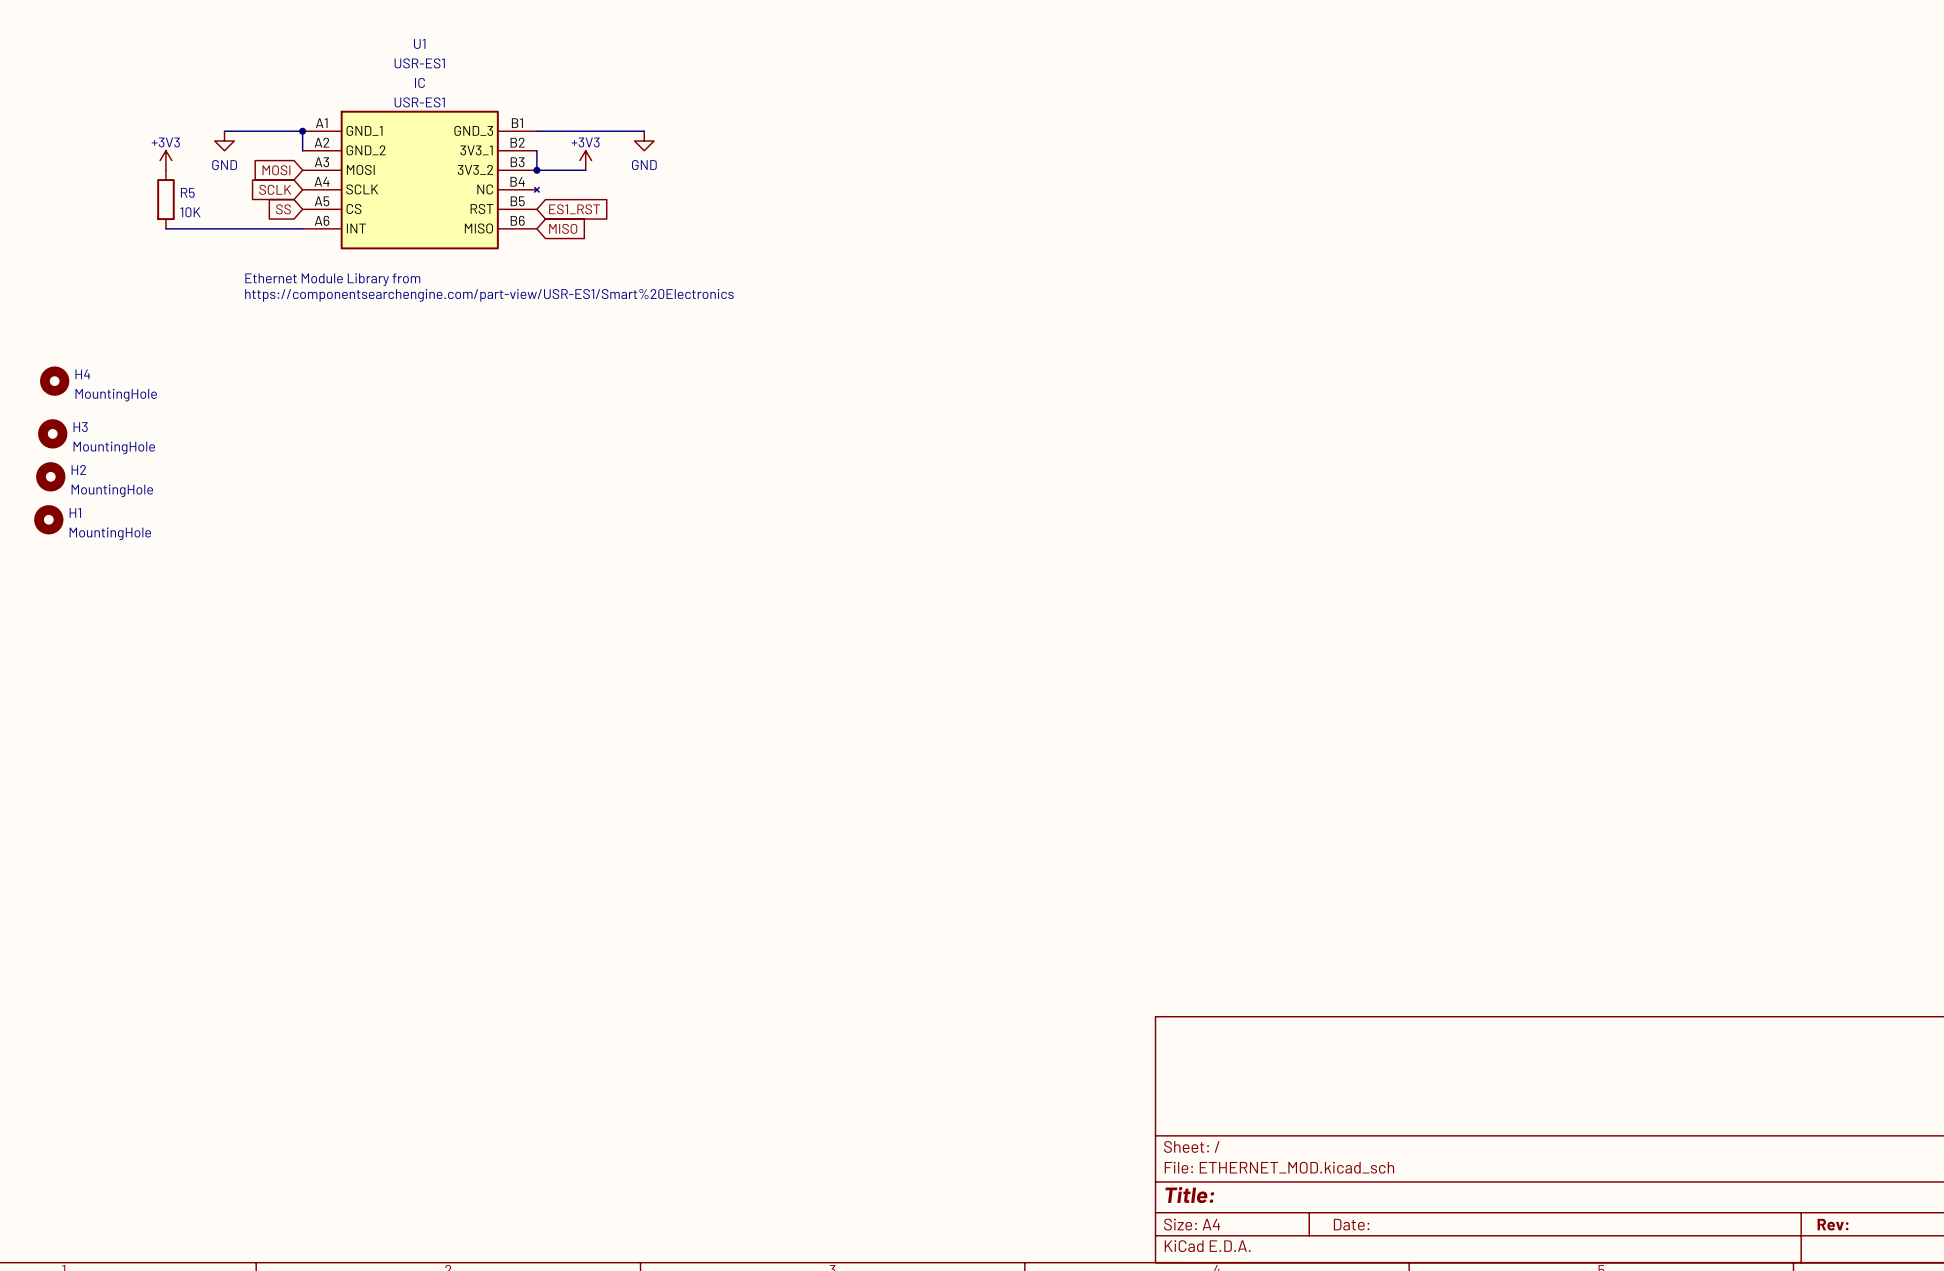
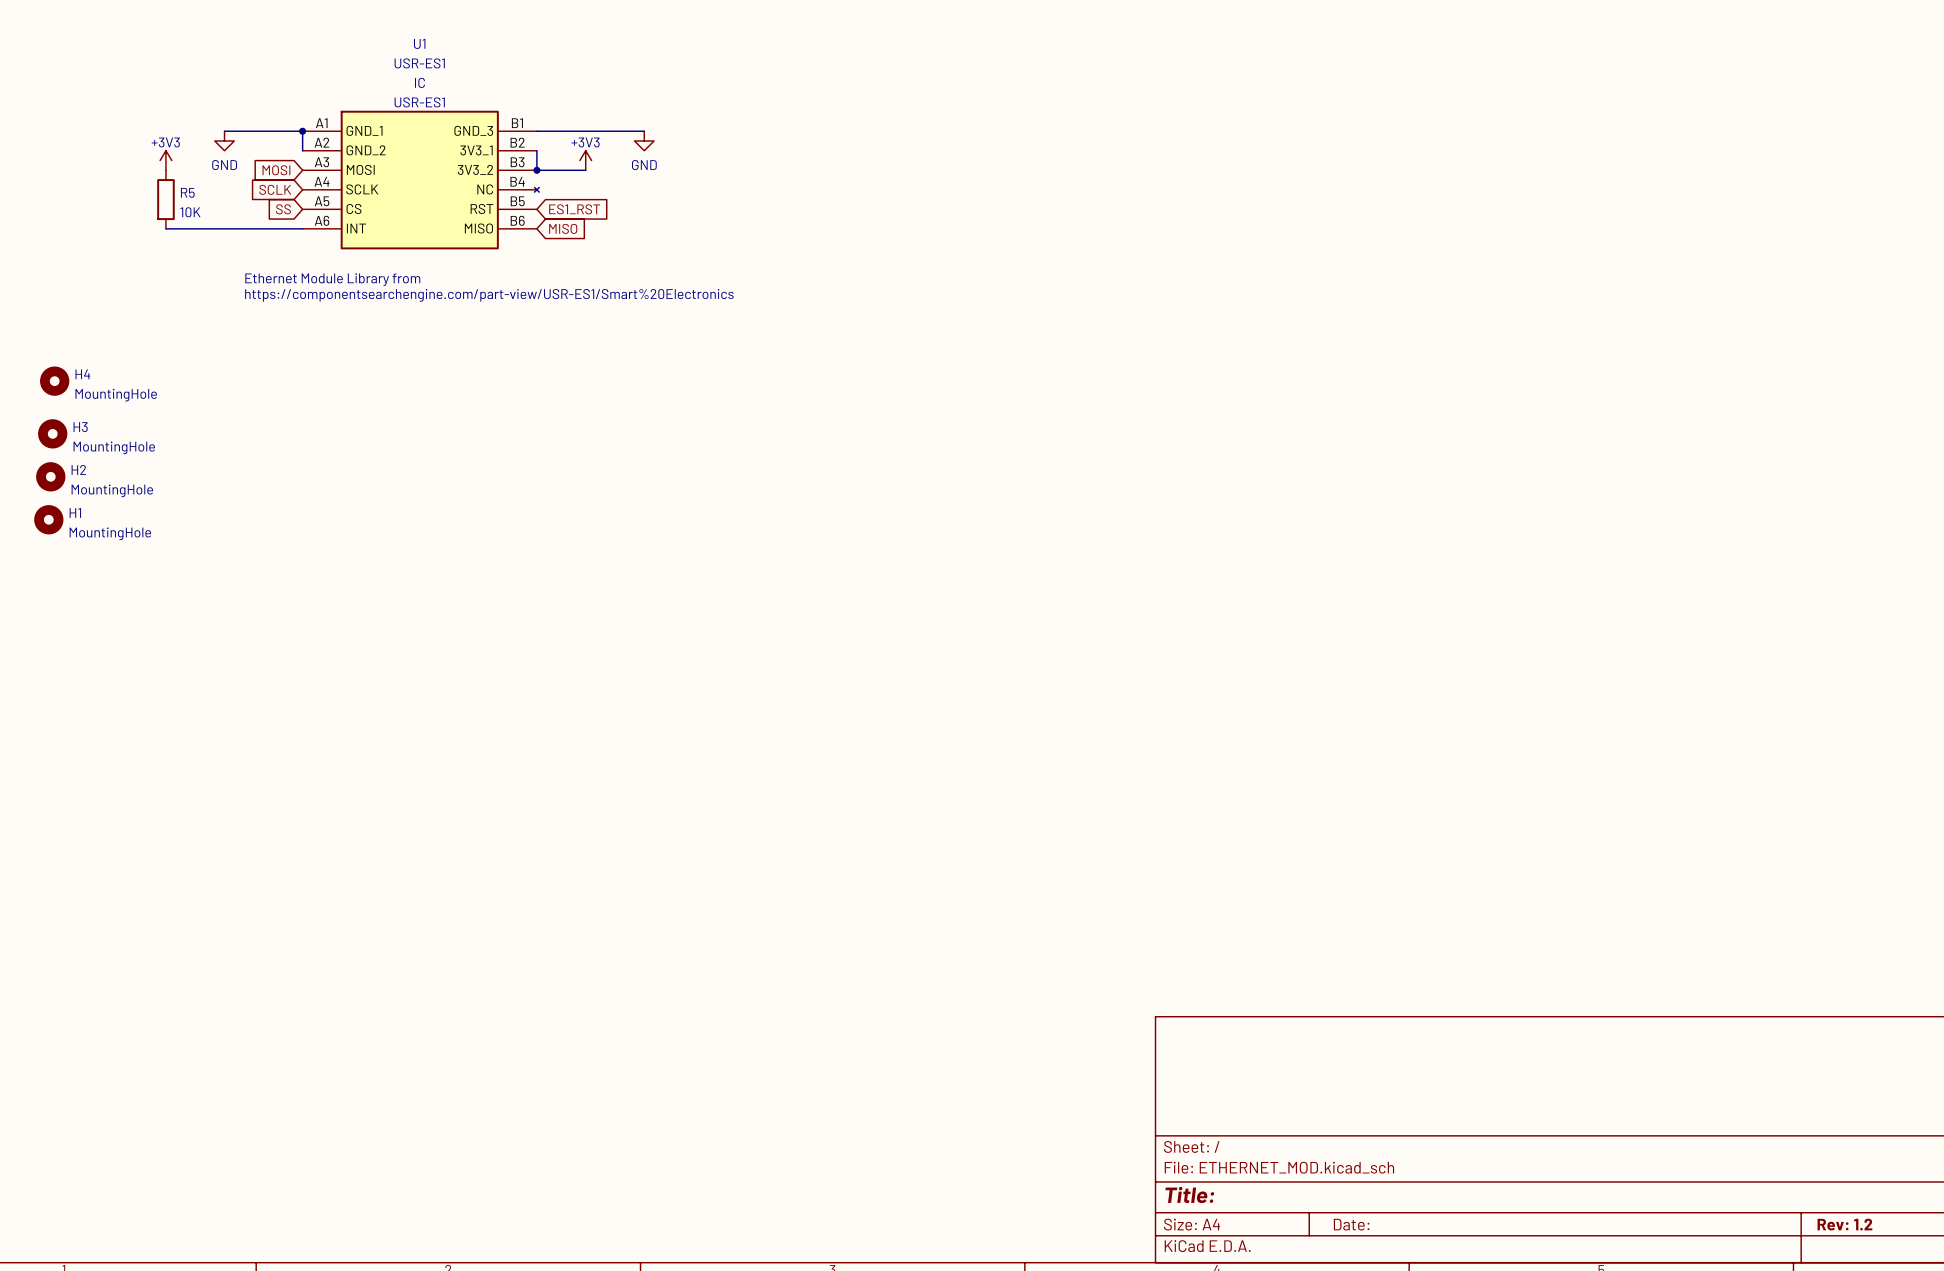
title block: Rev: (1833, 1224) -> Rev: 1.2 (1844, 1224)

